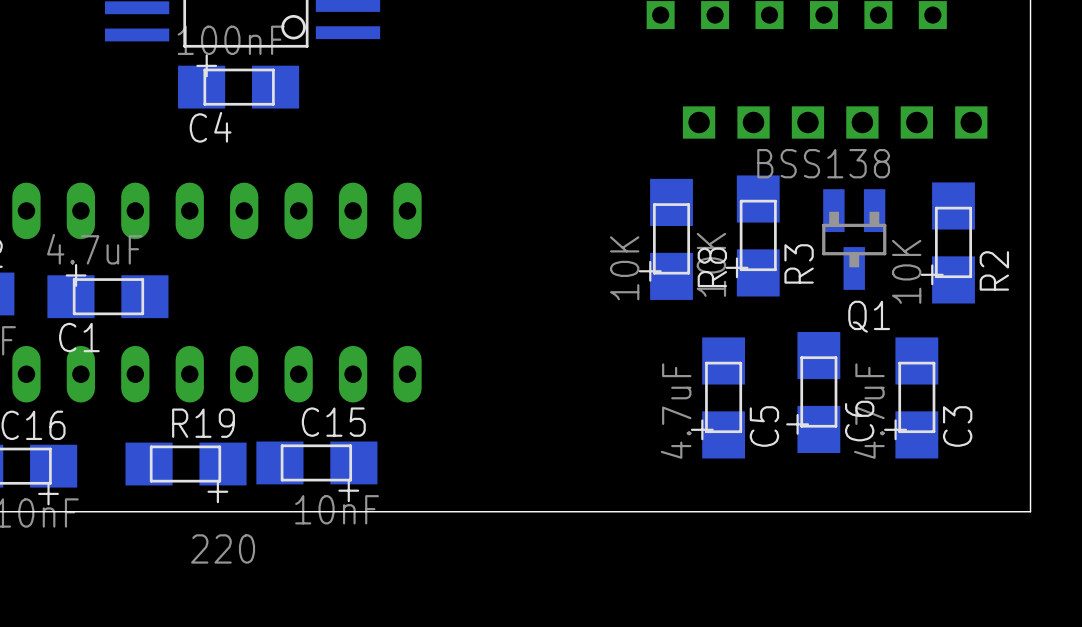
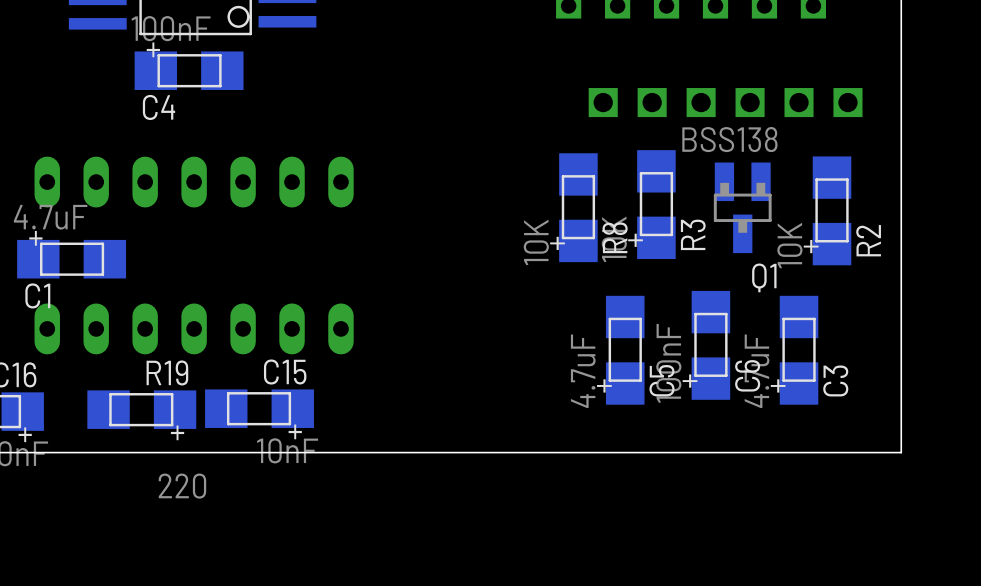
C6 value: none -> 100nF (668, 363)

